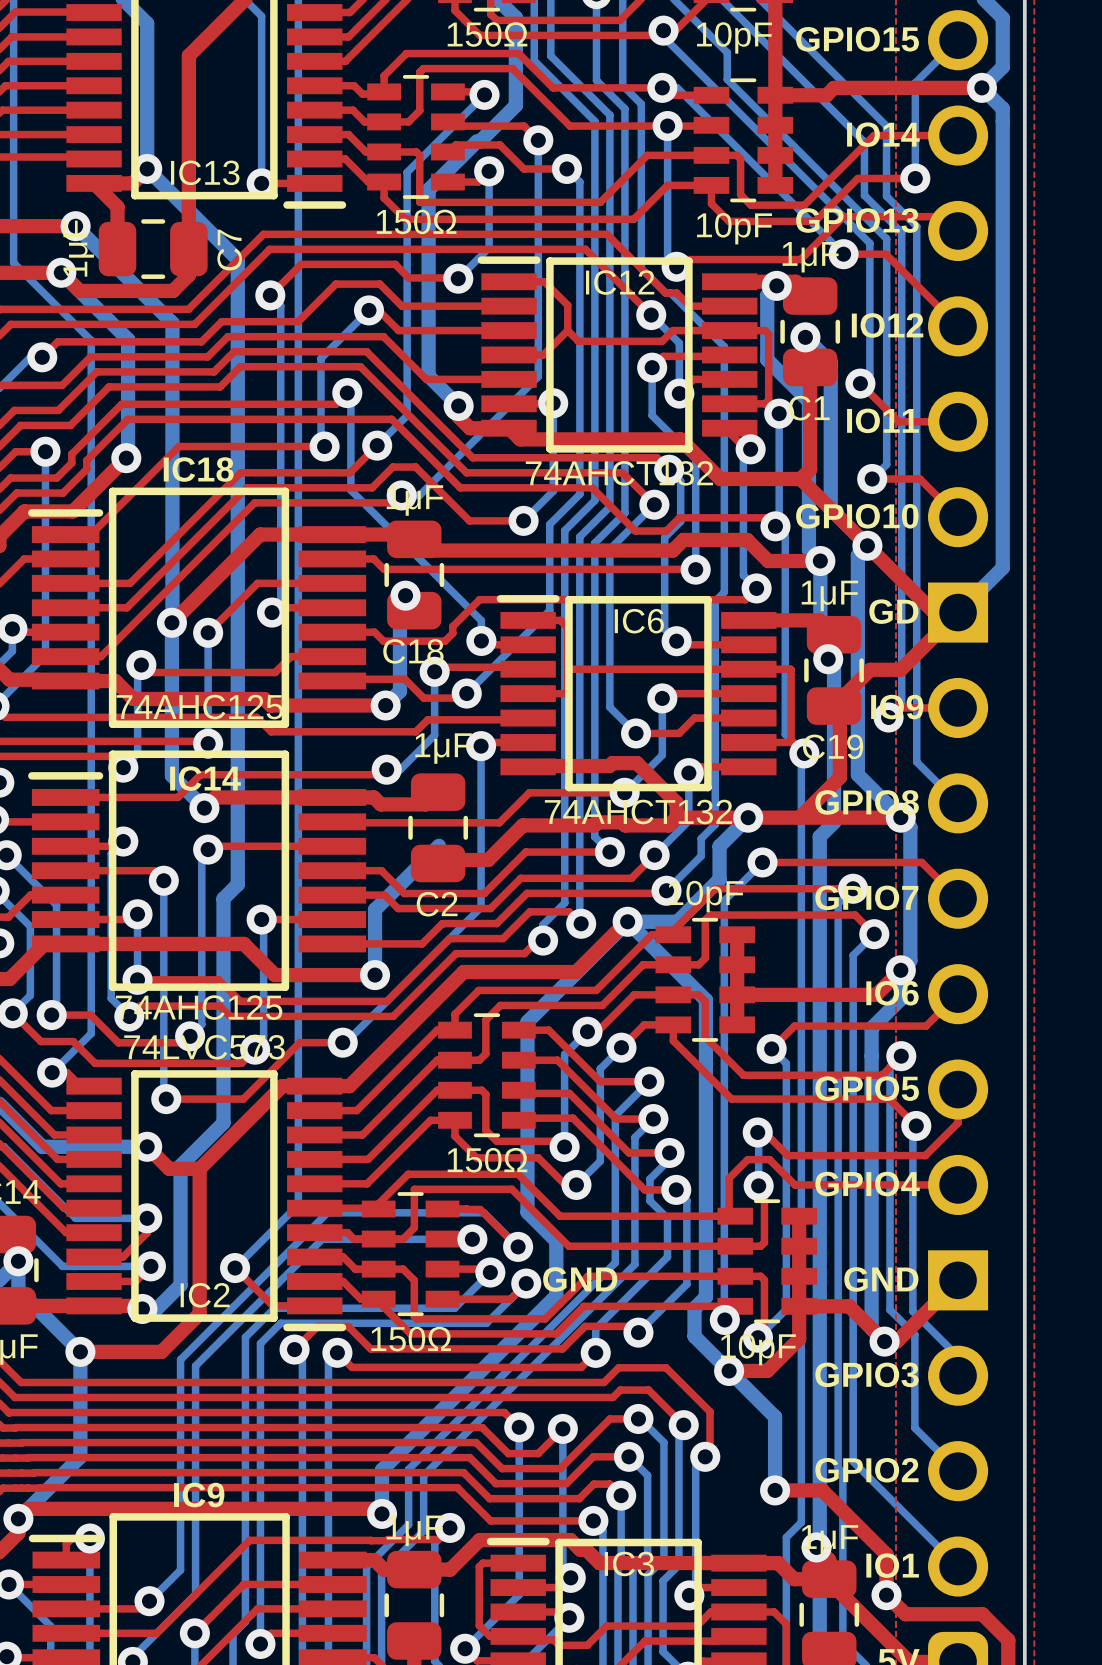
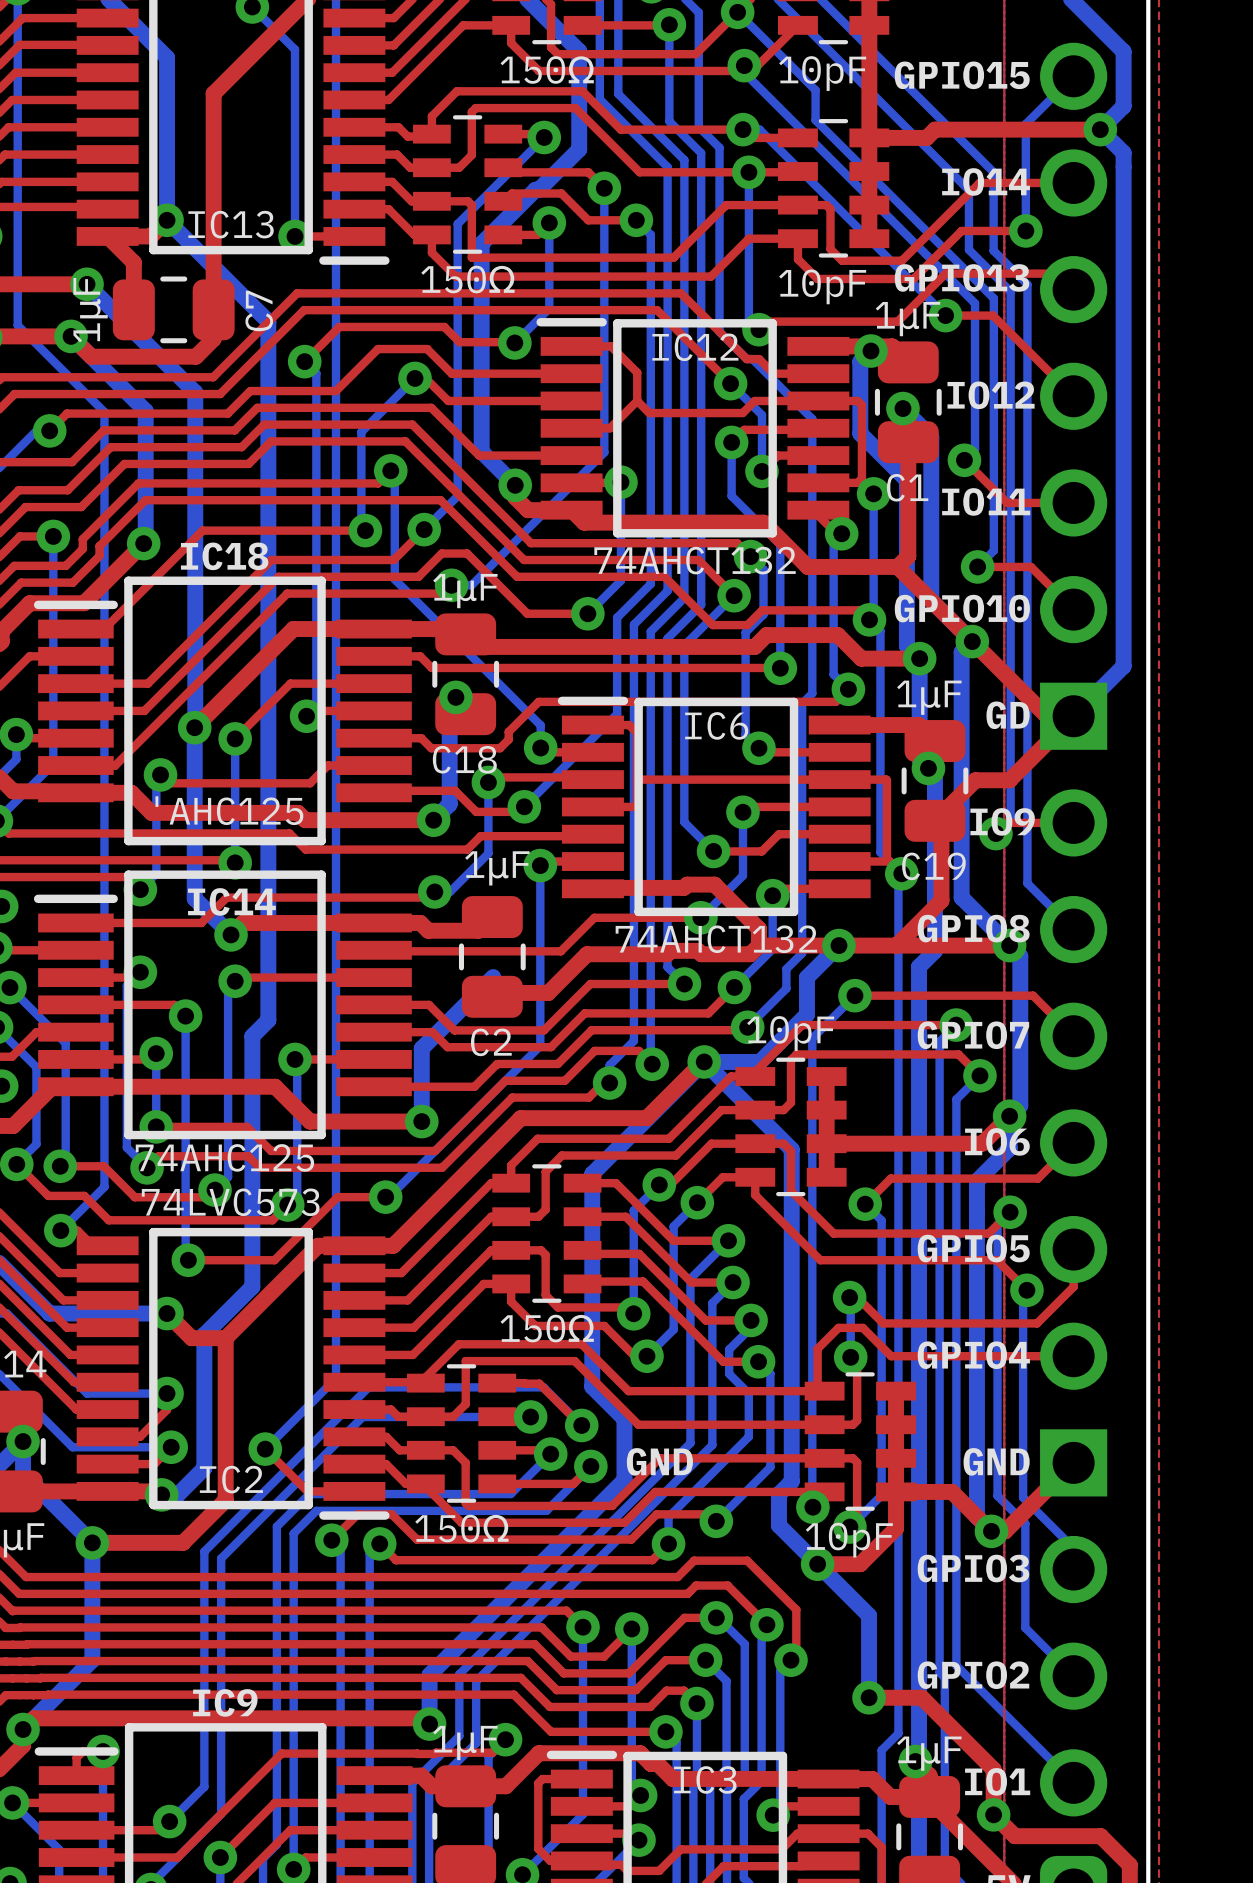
IC18 text: none -> 'AHC125 (229, 810)
IC18 text: 74AHC125 (199, 707) -> none

